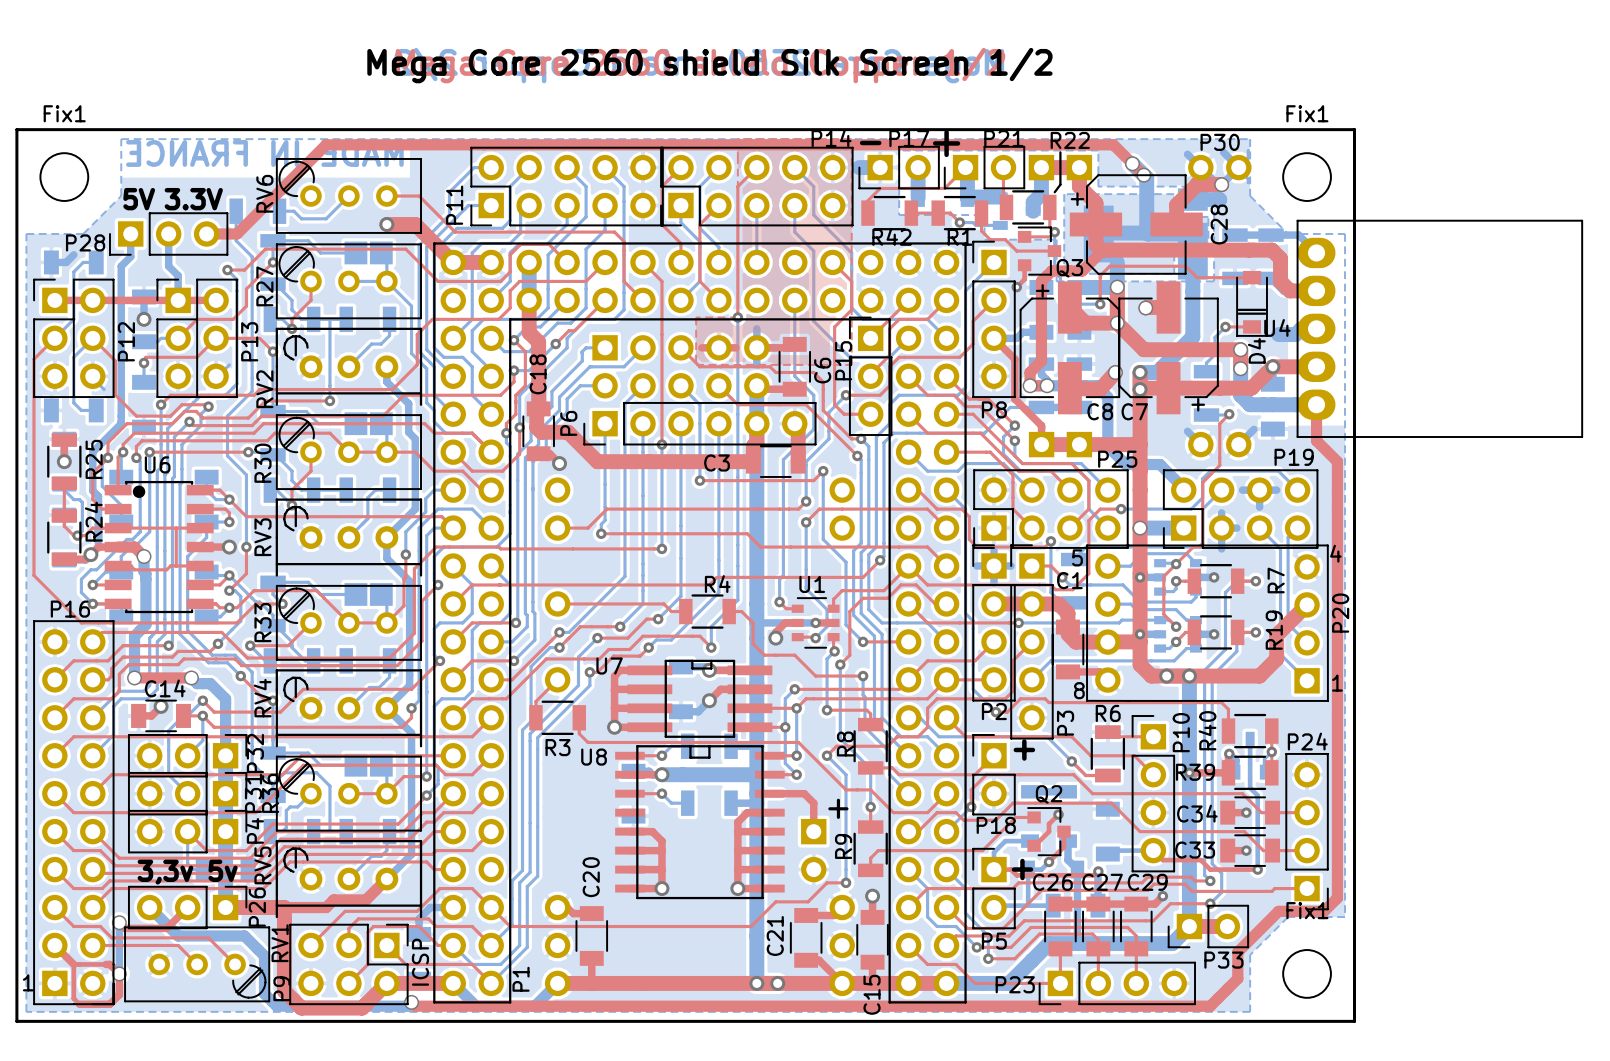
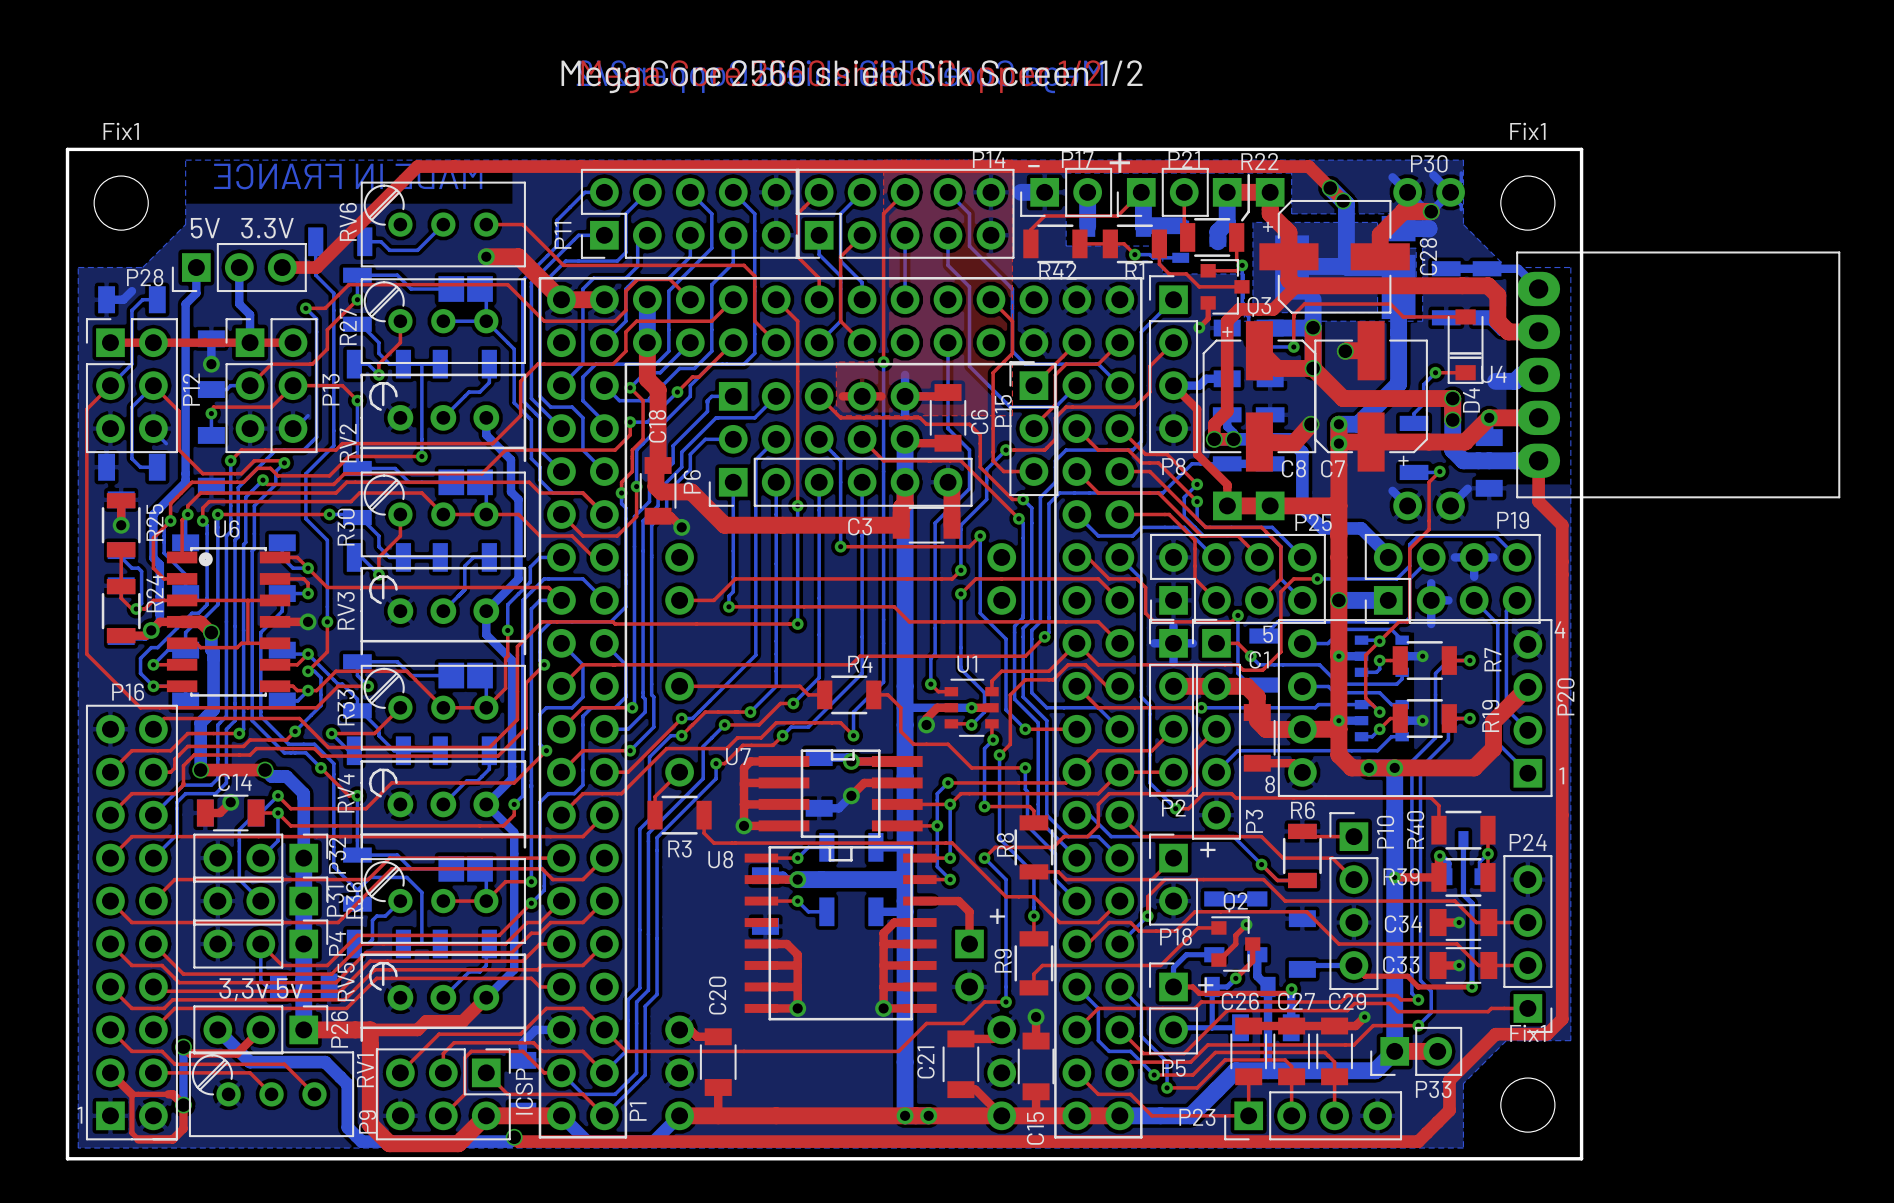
RV1 footprint: [124, 926, 271, 1003] -> [188, 1051, 355, 1138]

